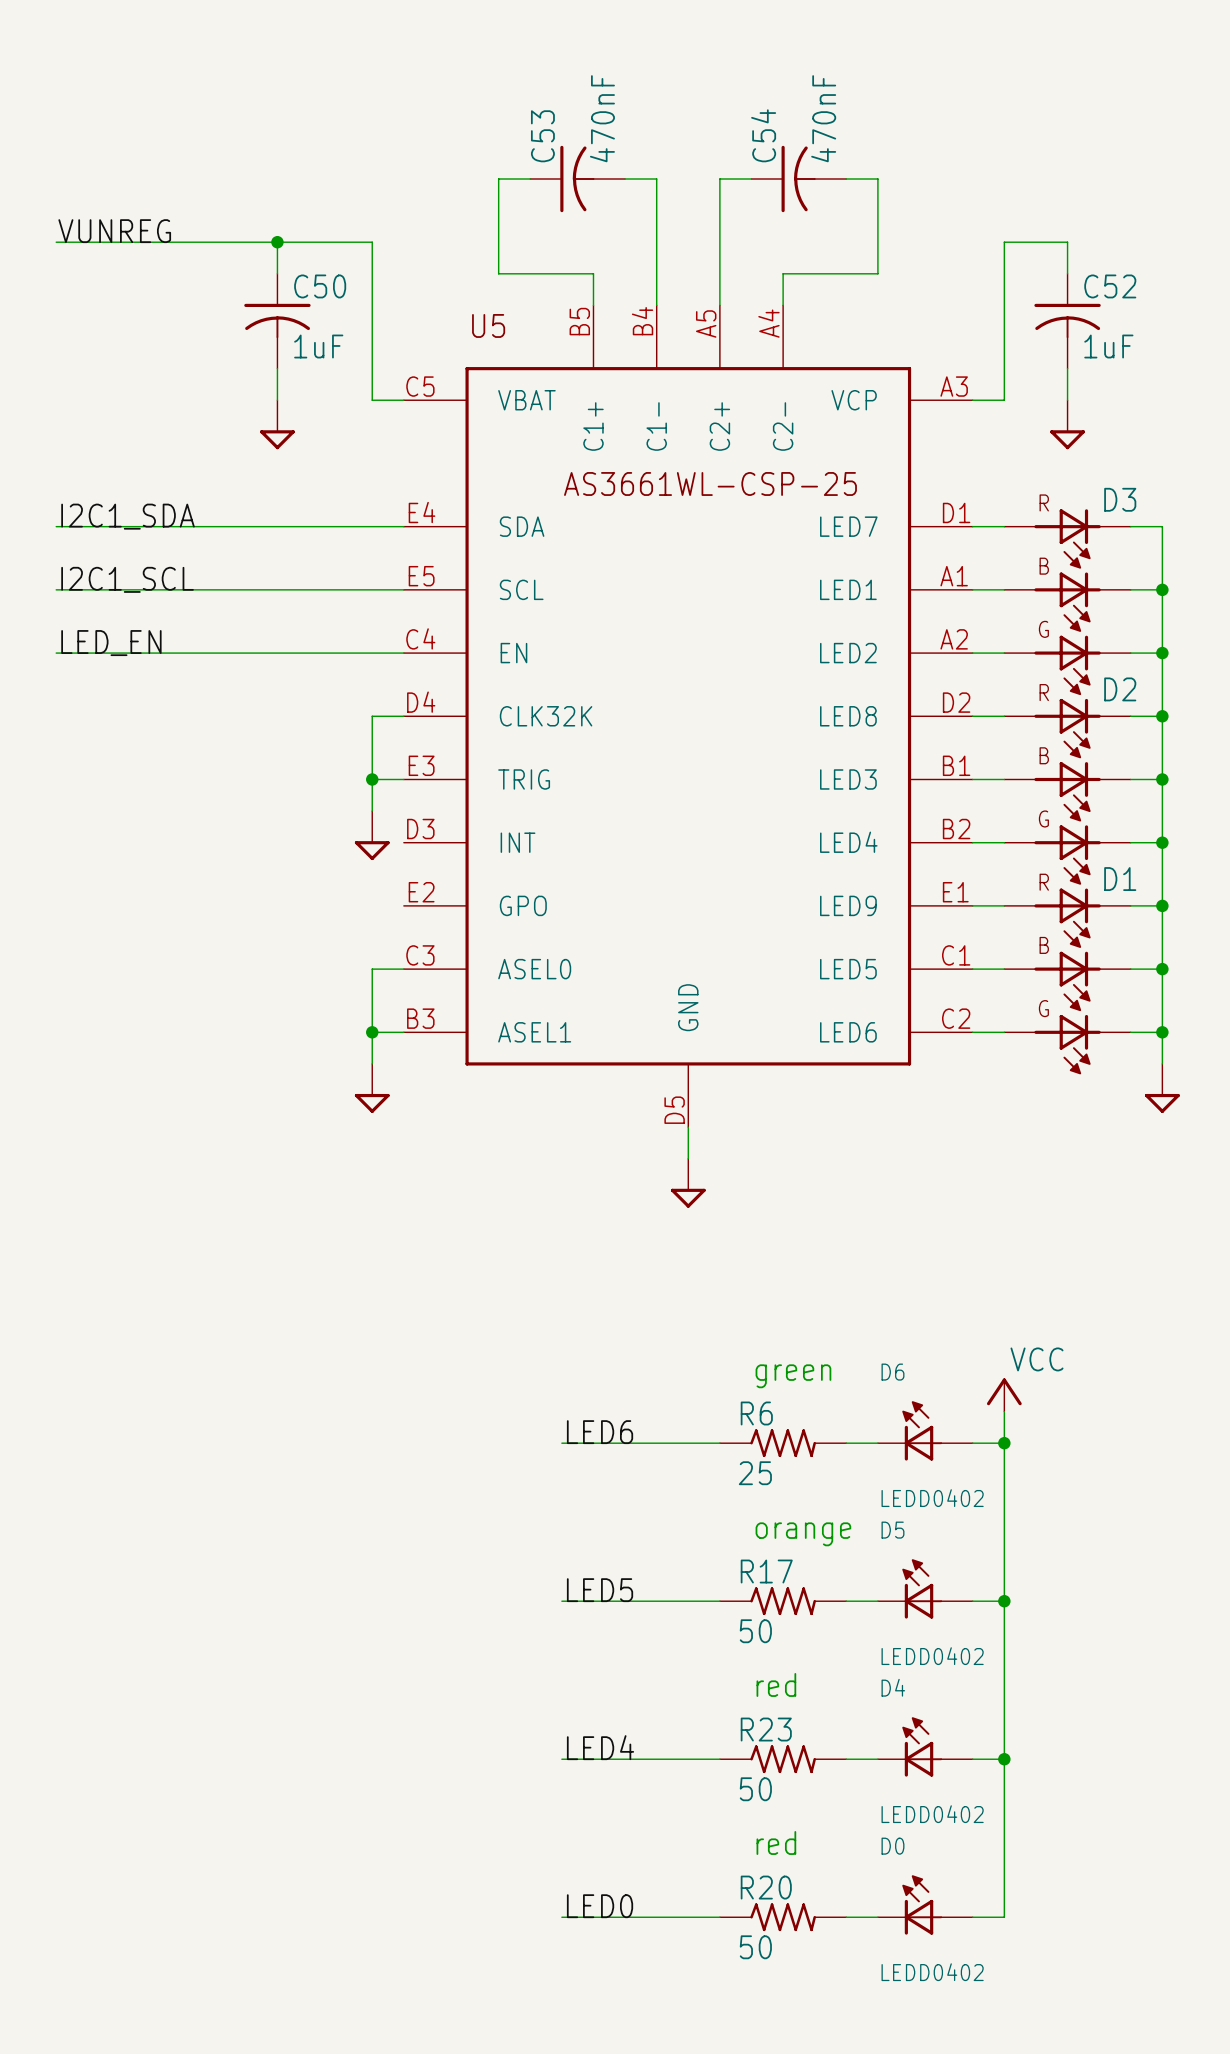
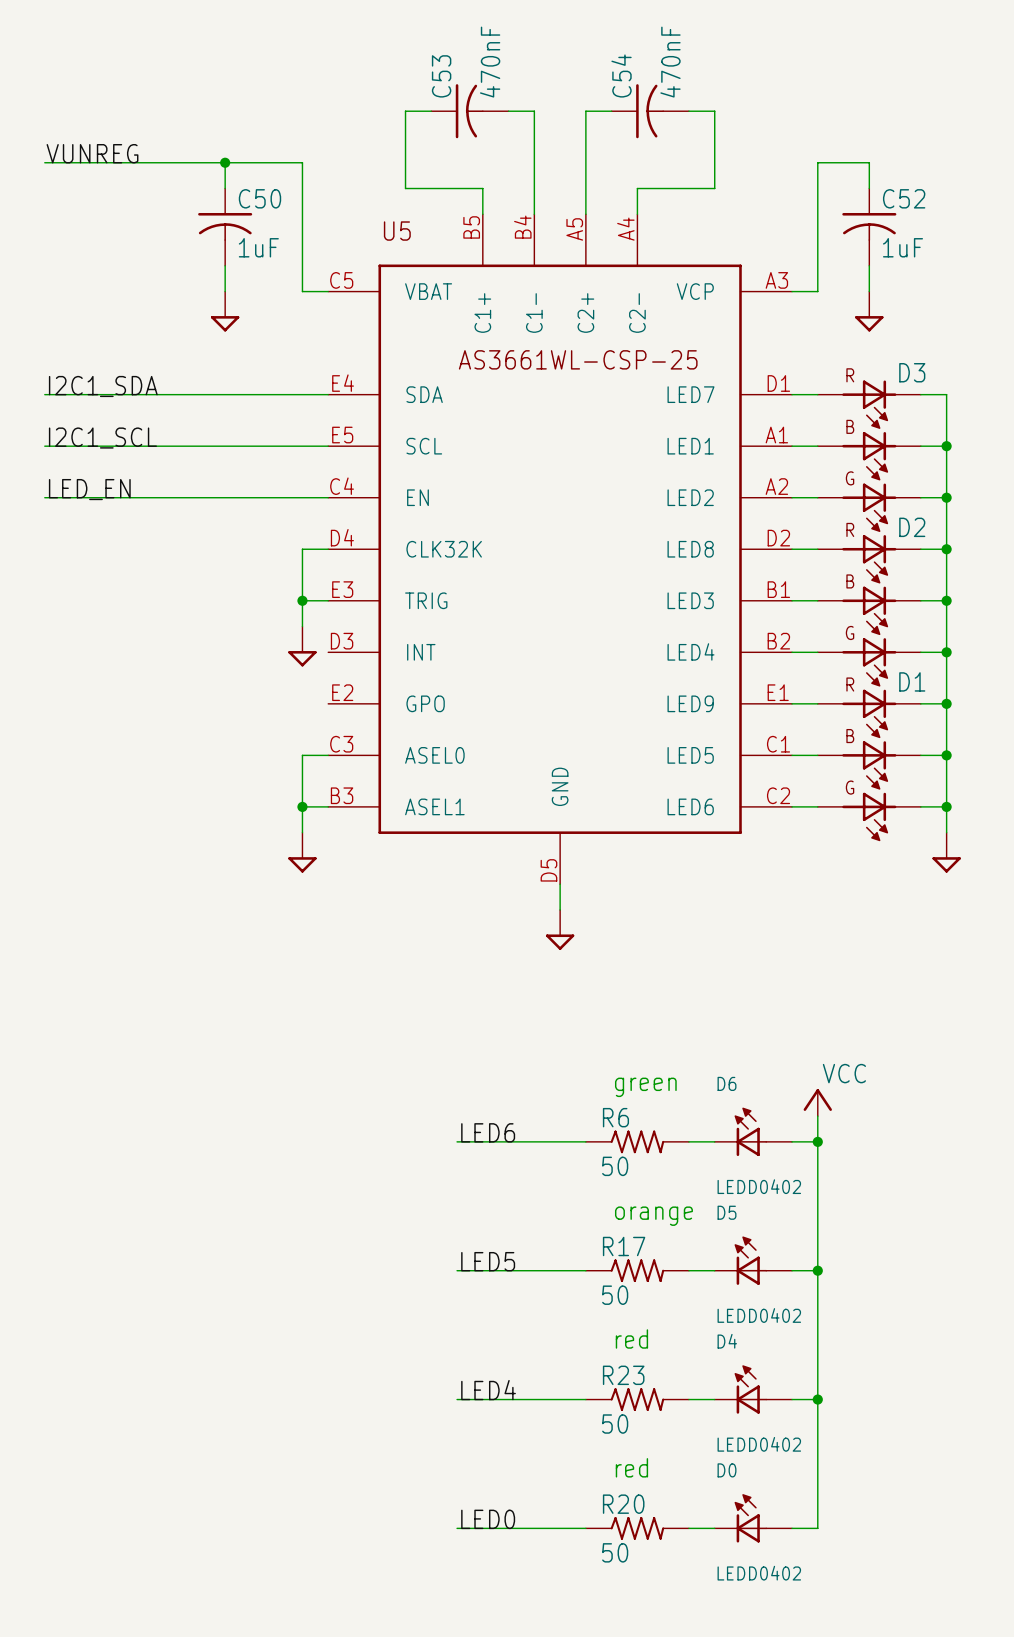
R6 value: 25 (755, 1473) -> 50 (615, 1166)

